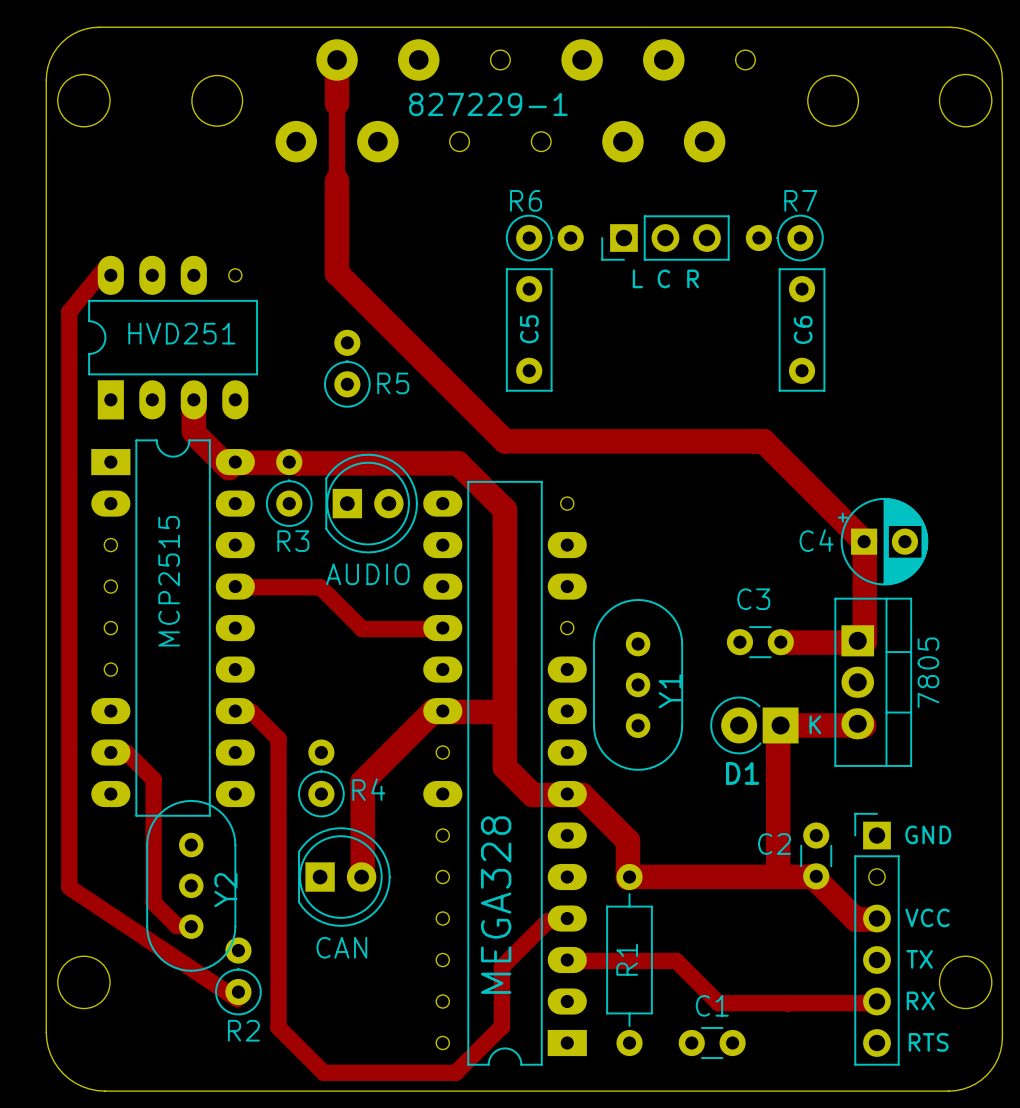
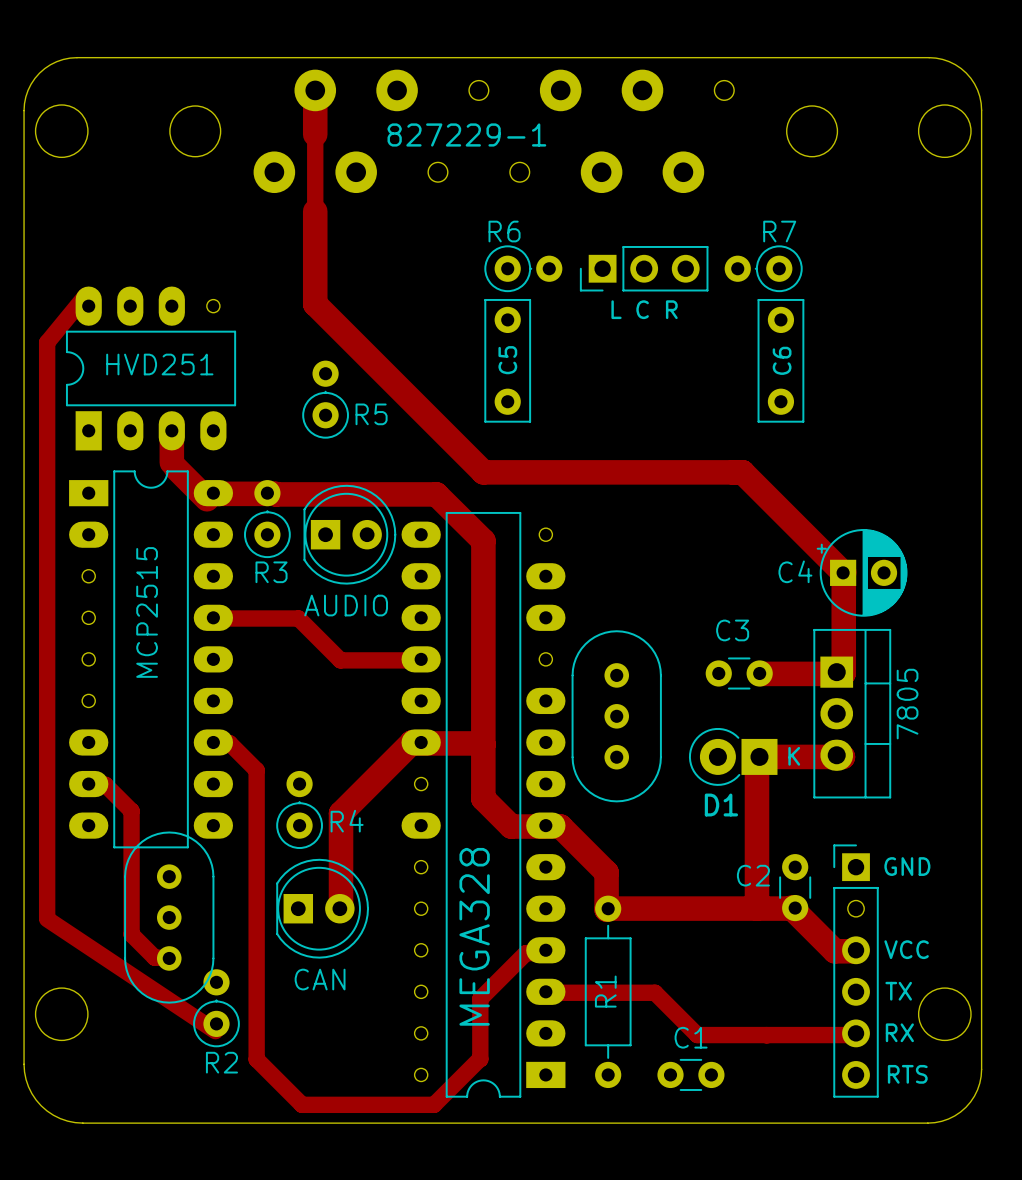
Y1 name: Y1 (670, 691) -> none
Y2 name: Y2 (225, 890) -> none

